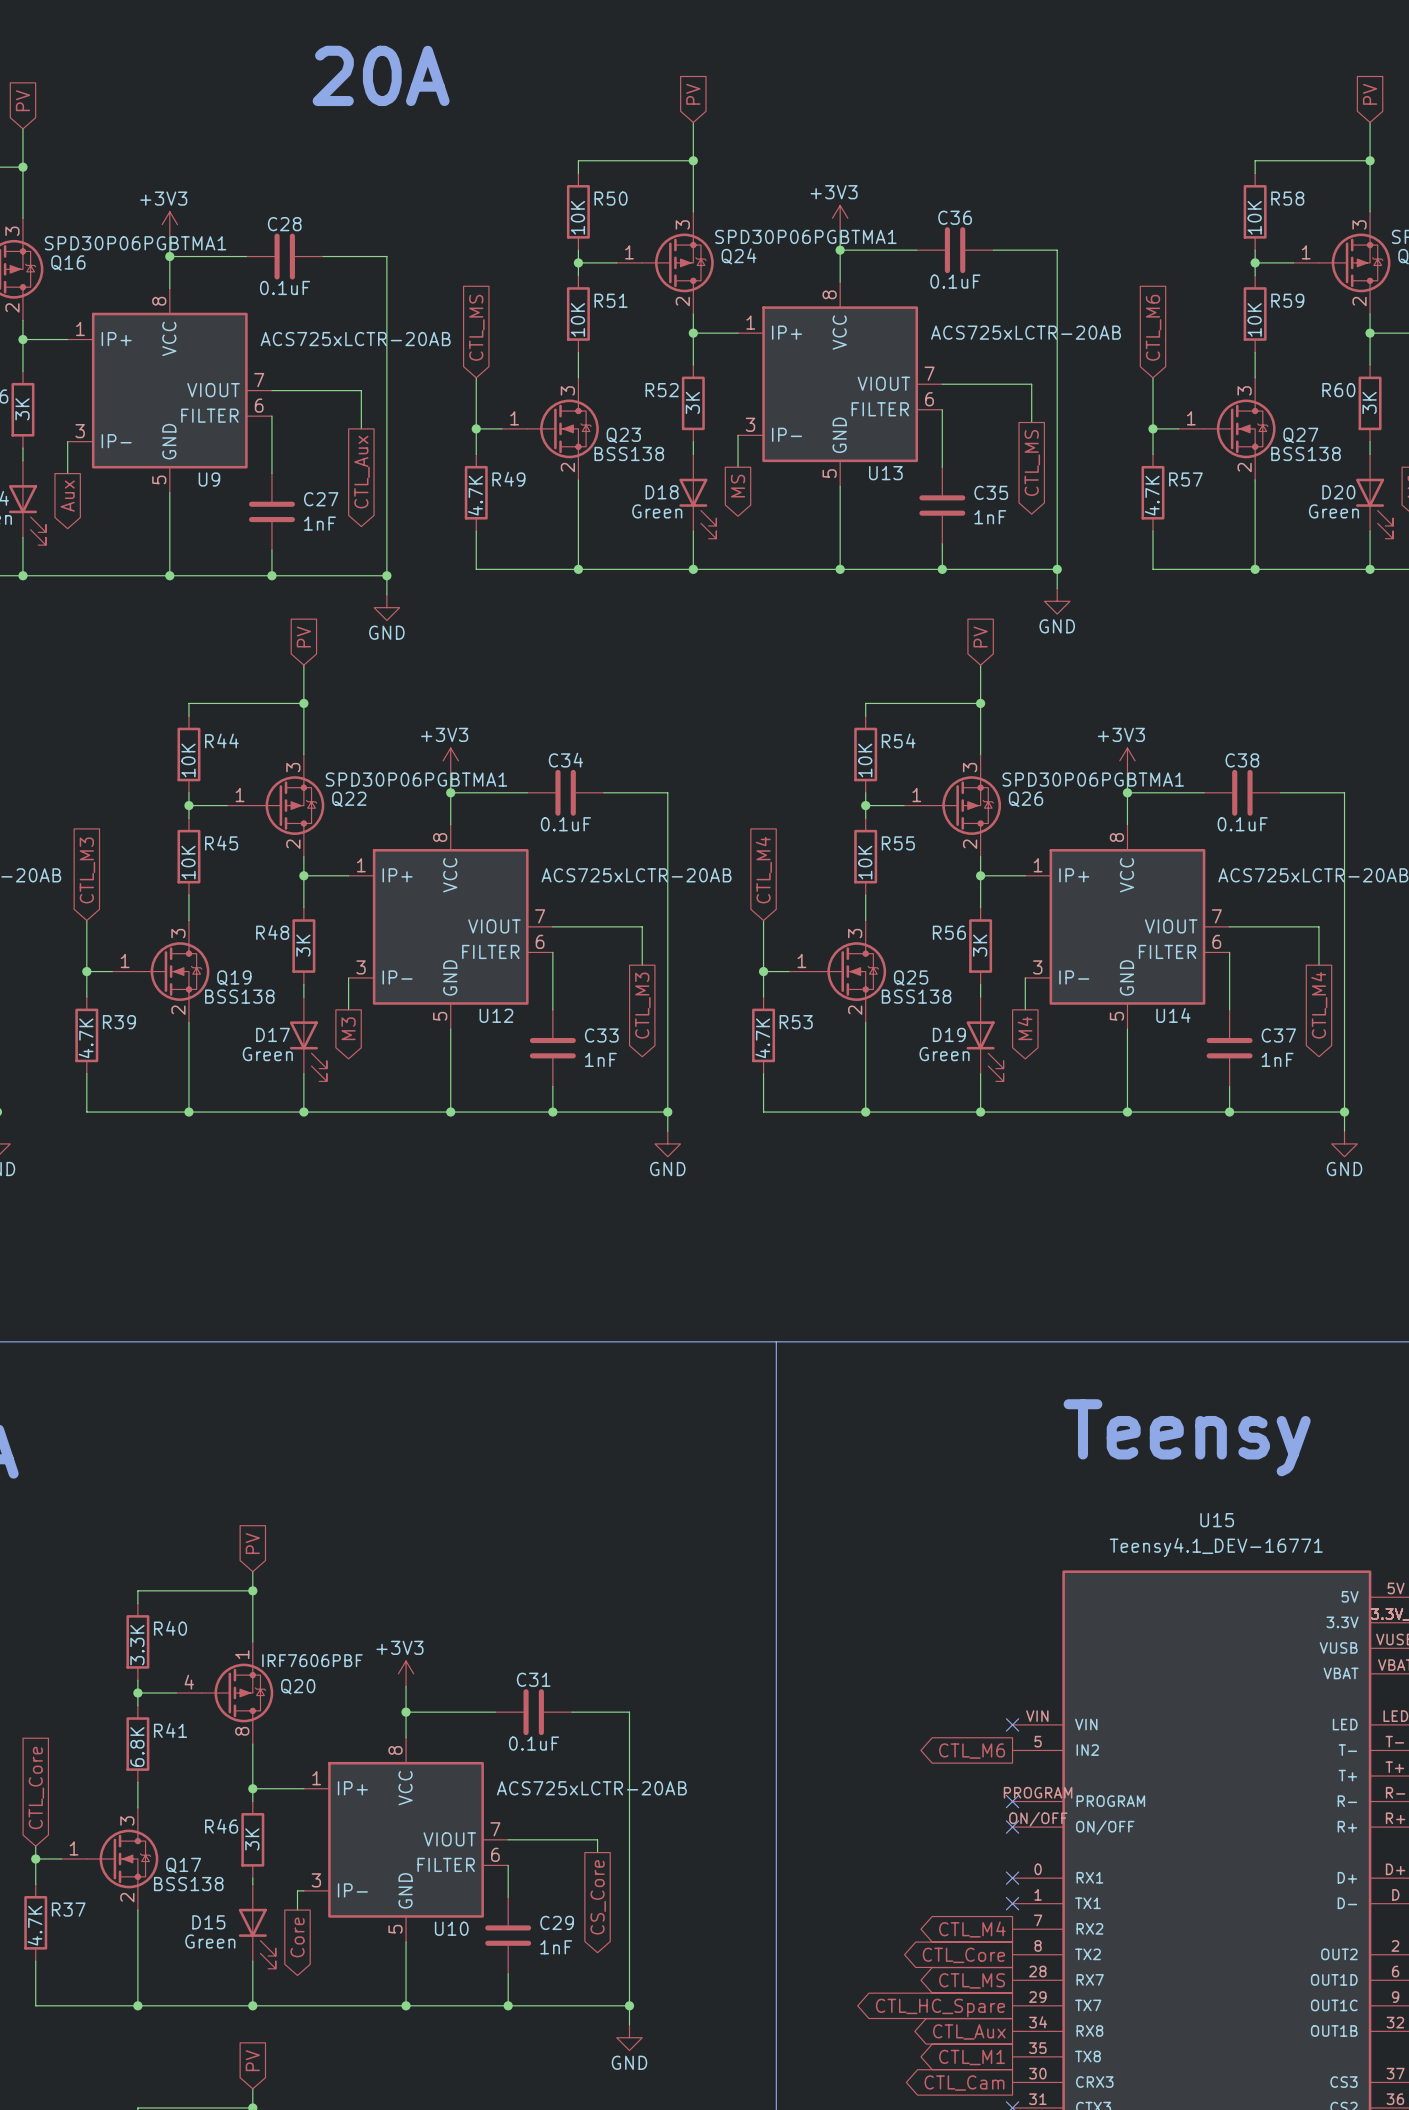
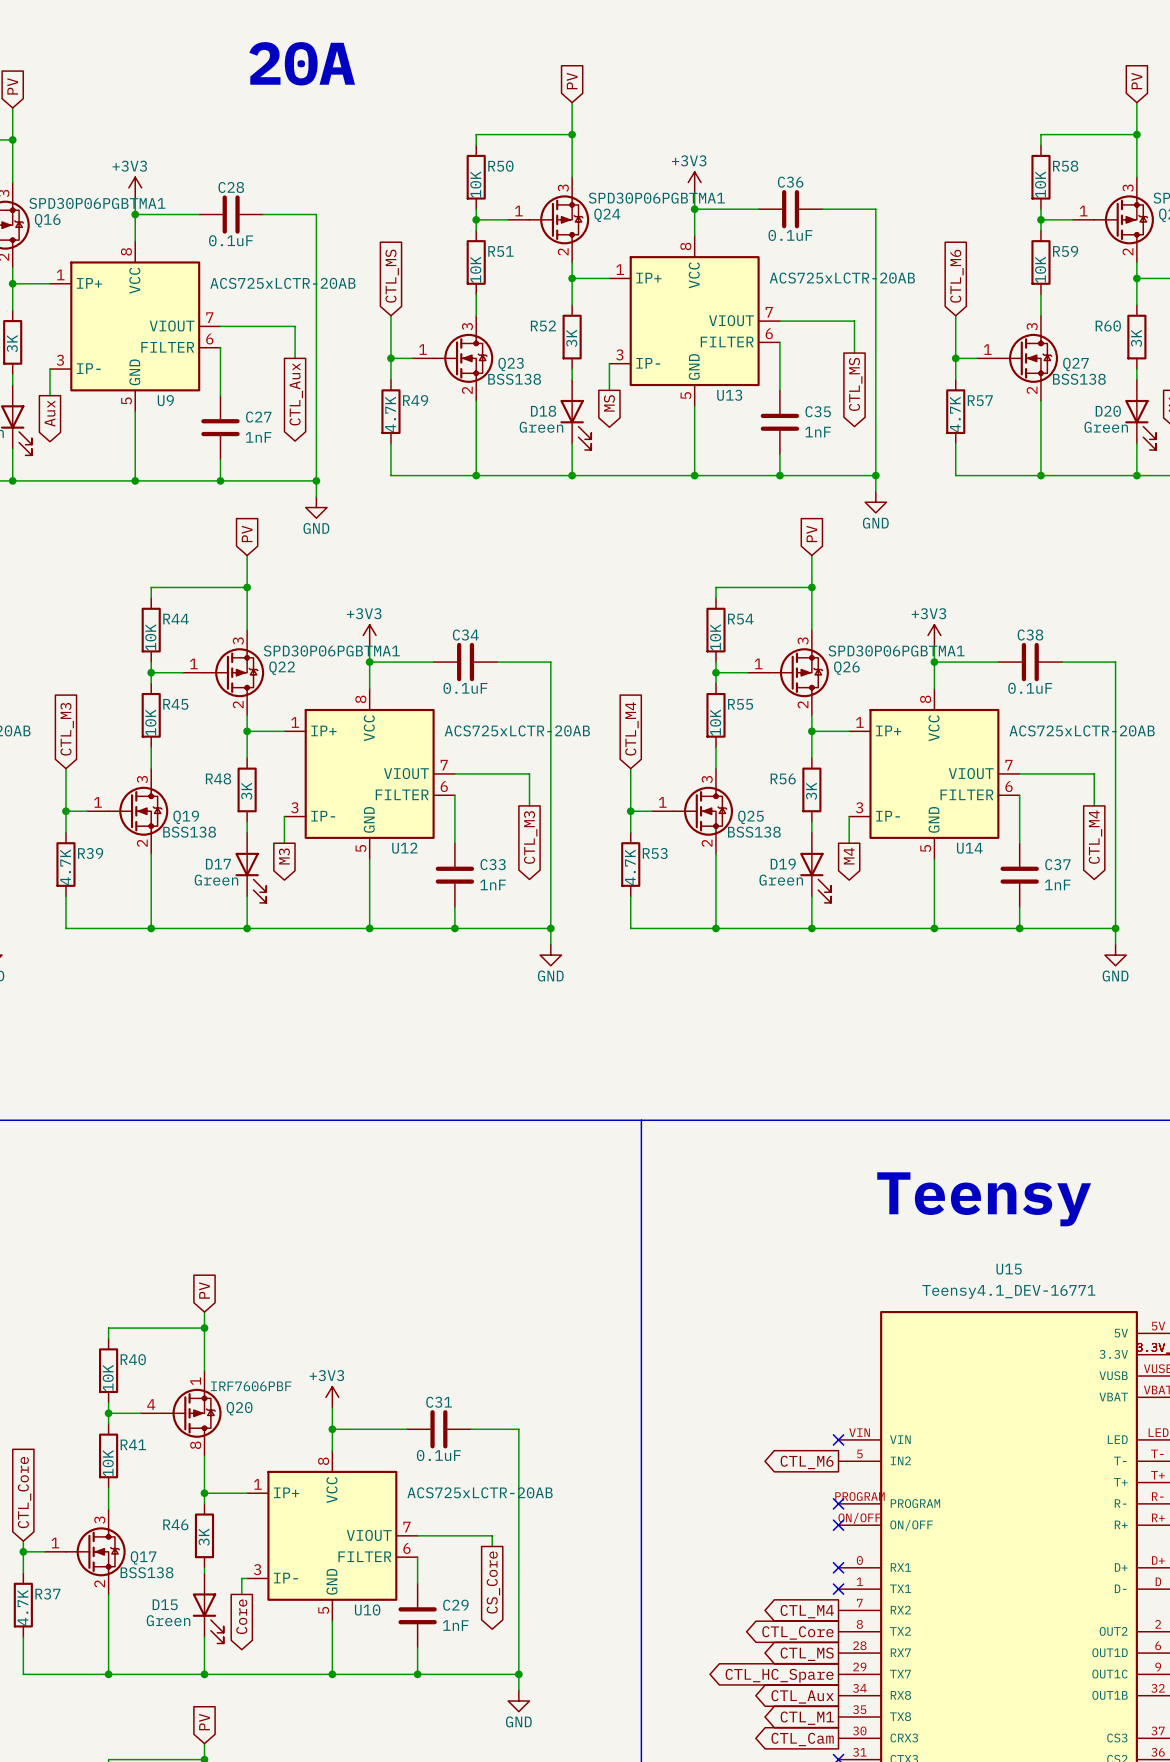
R40 value: 3.3K (137, 1645) -> 10K (108, 1378)
R41 value: 6.8K (137, 1747) -> 10K (108, 1463)

